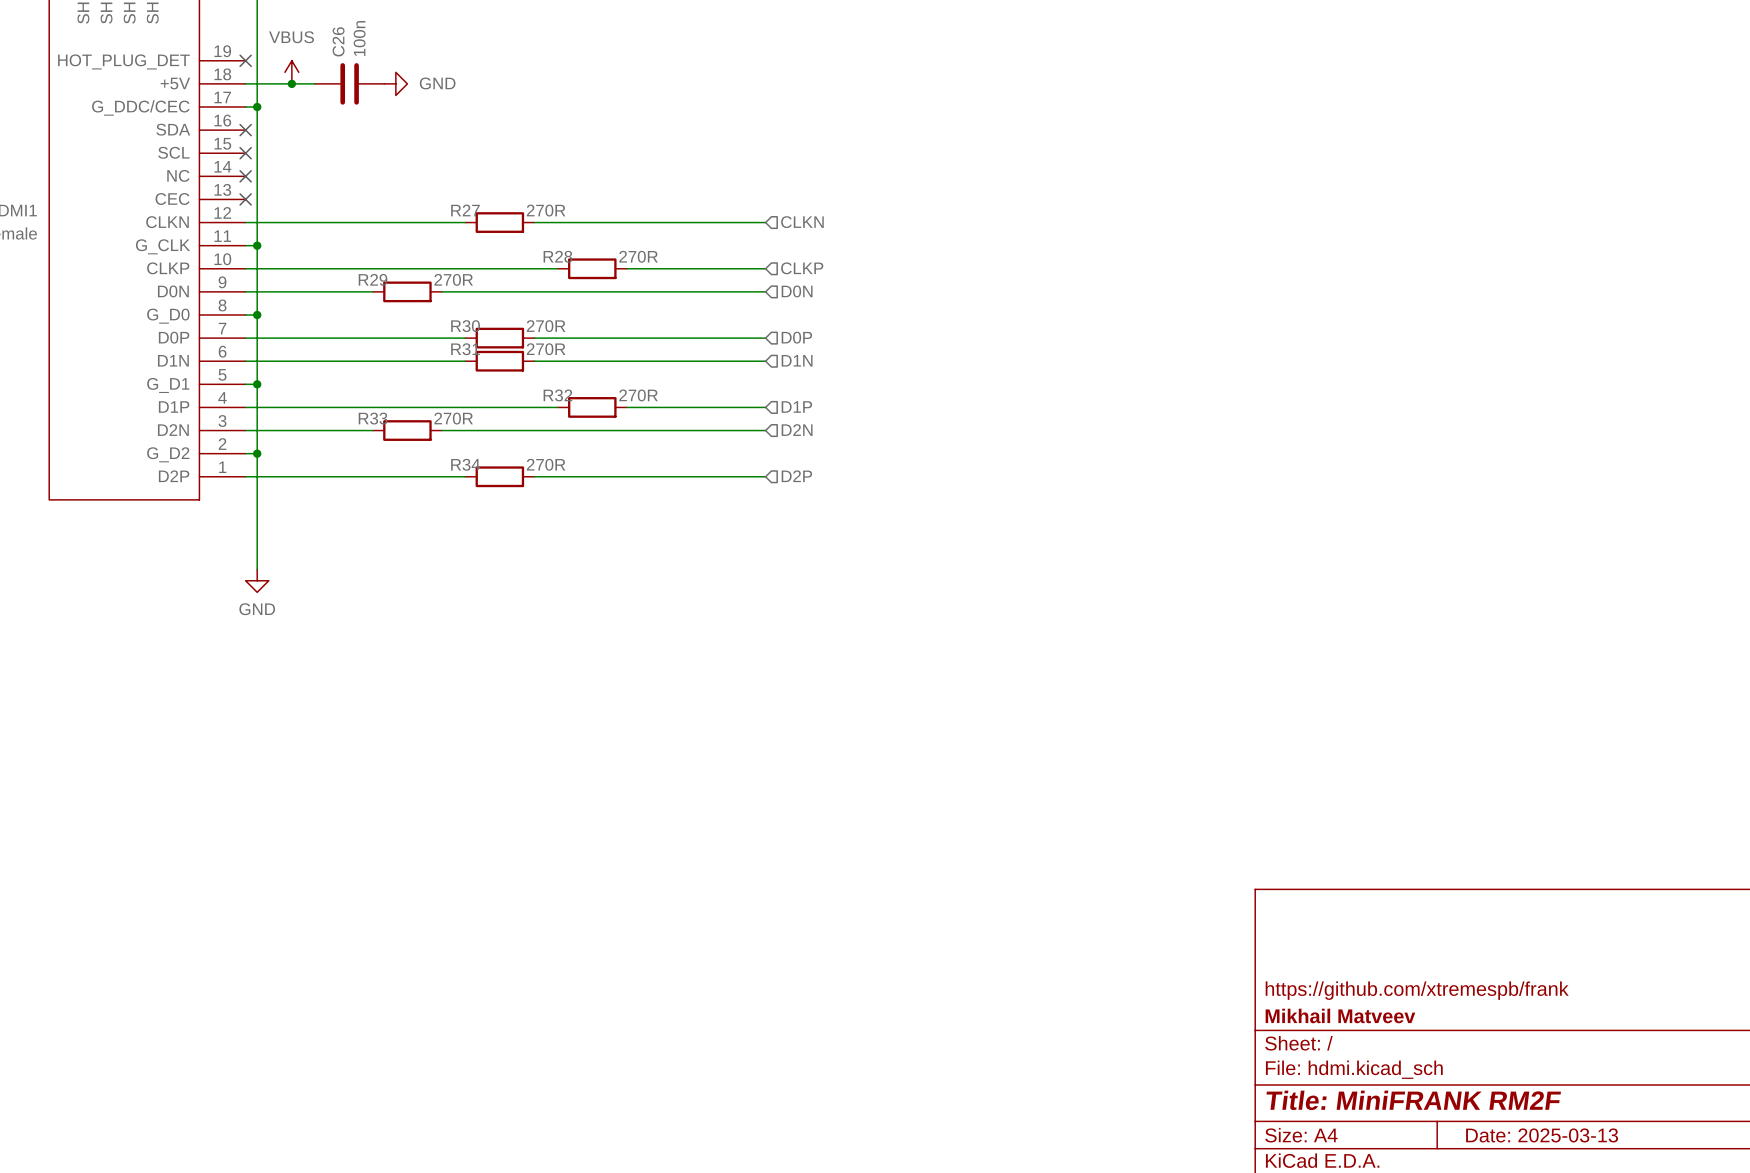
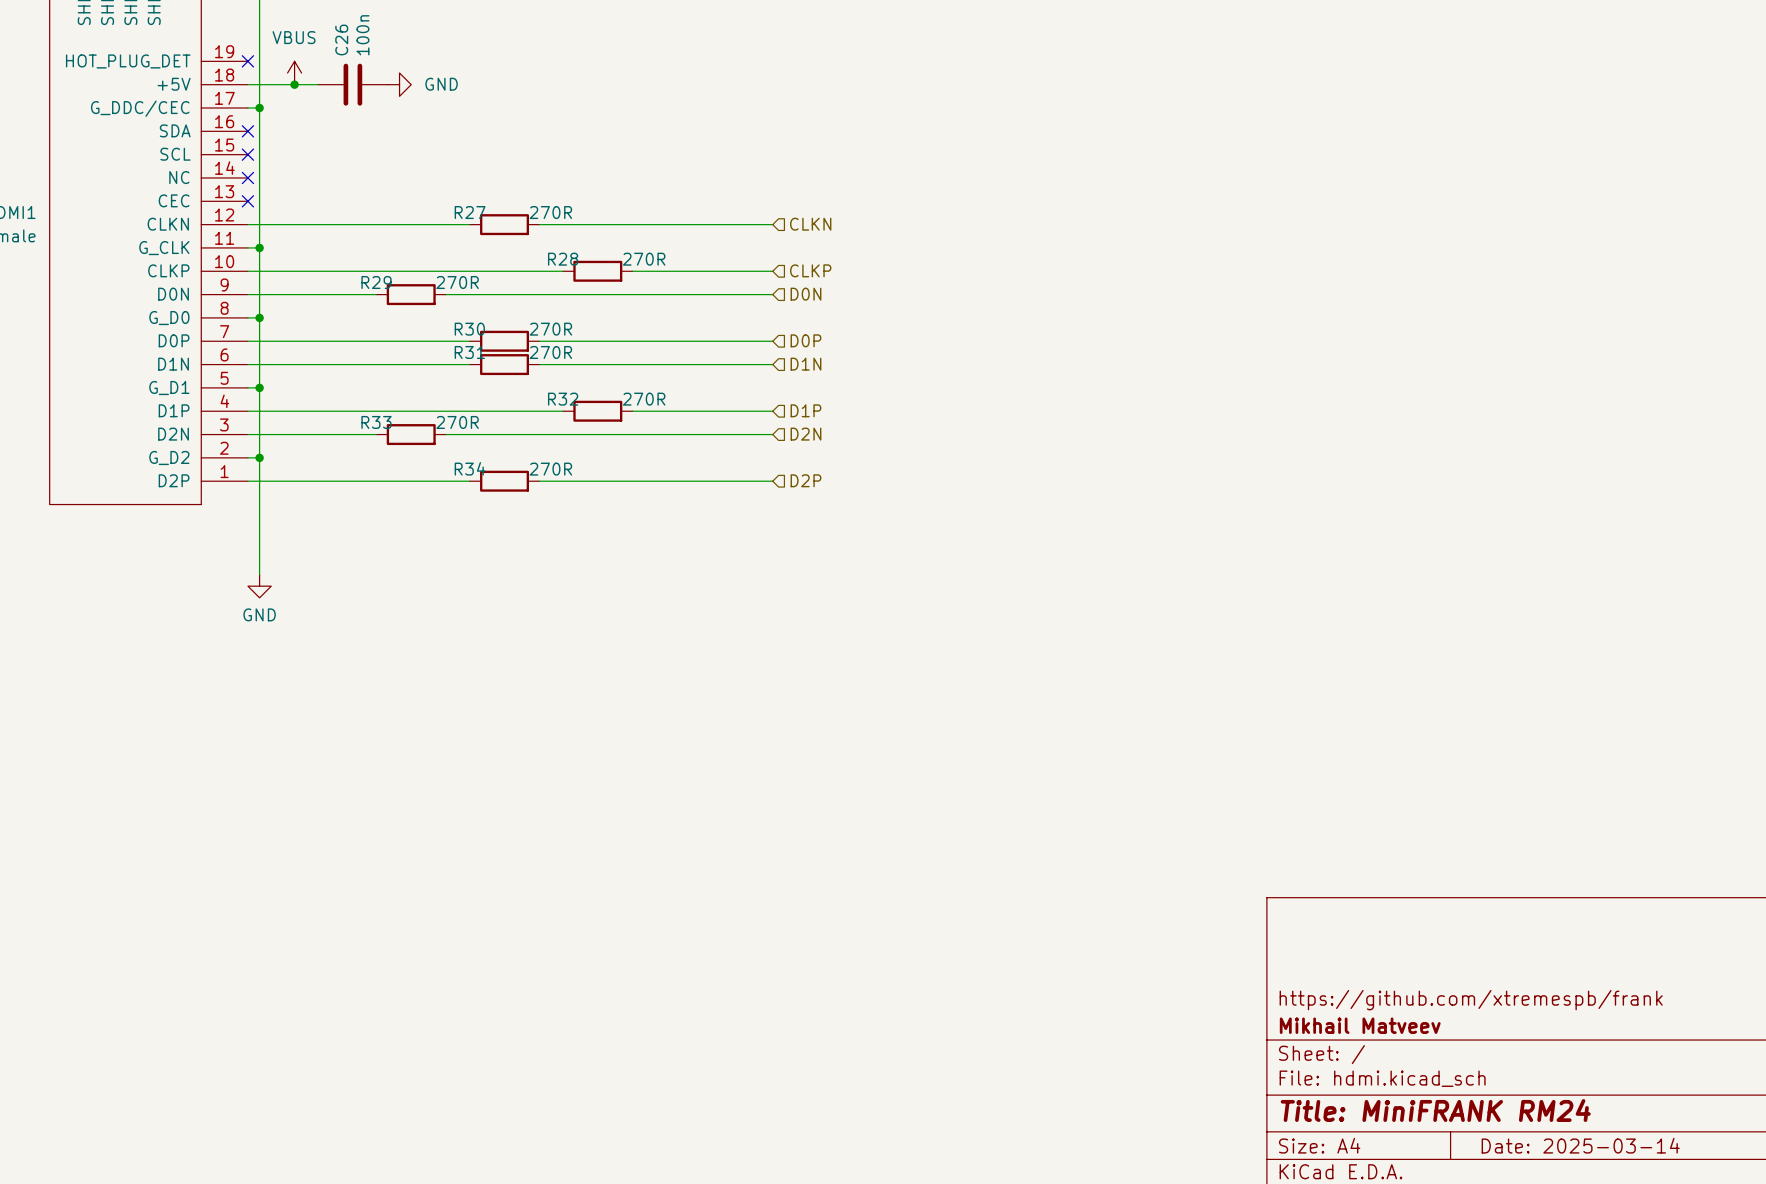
title block: Title: MiniFRANK RM2F (1413, 1100) -> Title: MiniFRANK RM24 (1435, 1110)
title block: Date: 2025-03-13 (1542, 1135) -> Date: 2025-03-14 (1580, 1145)

